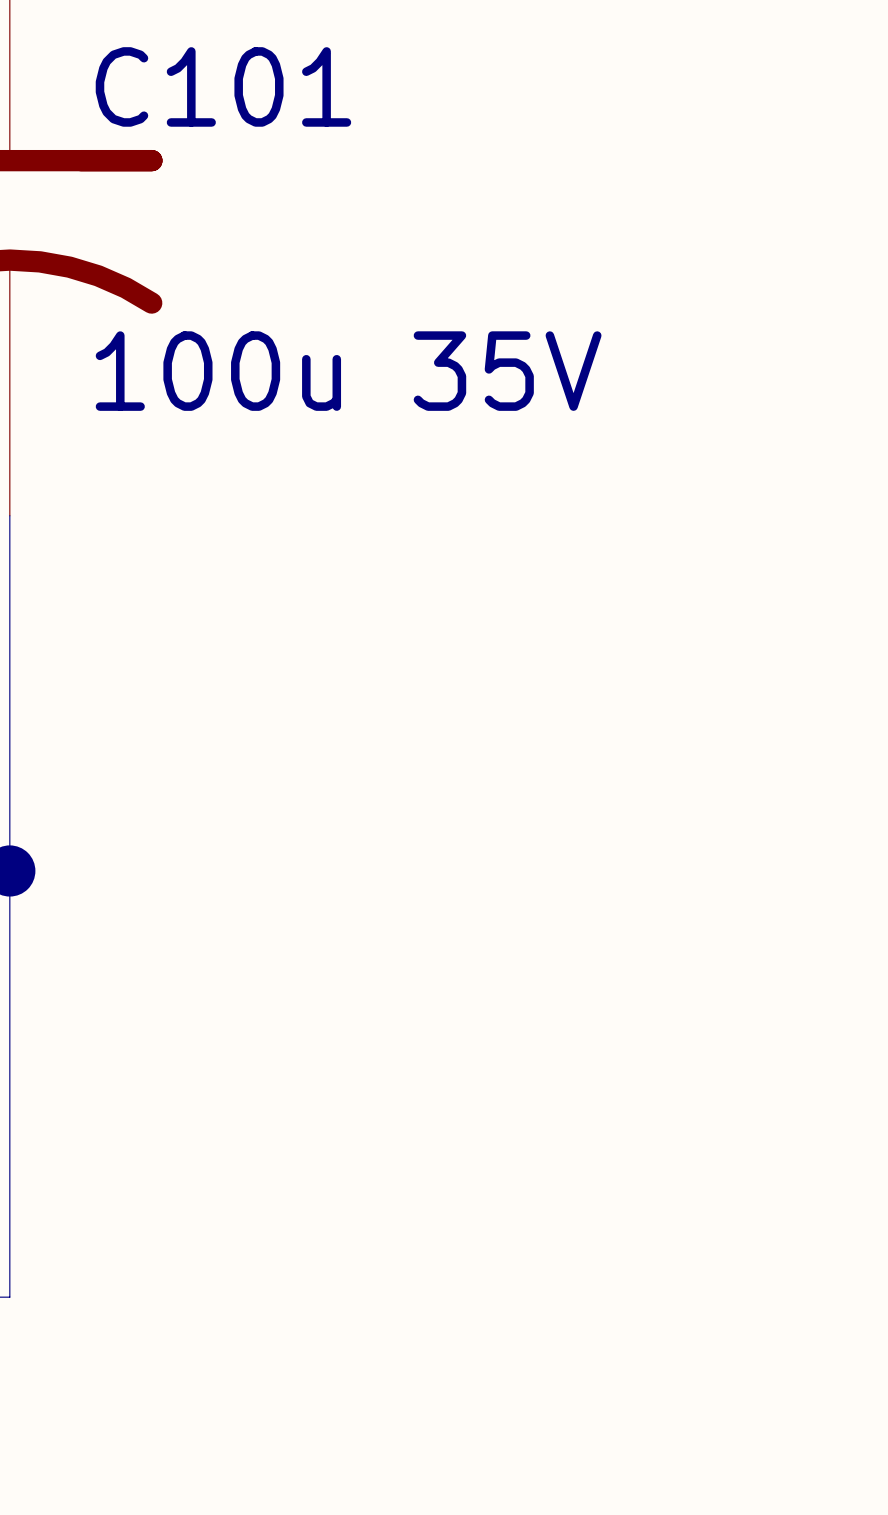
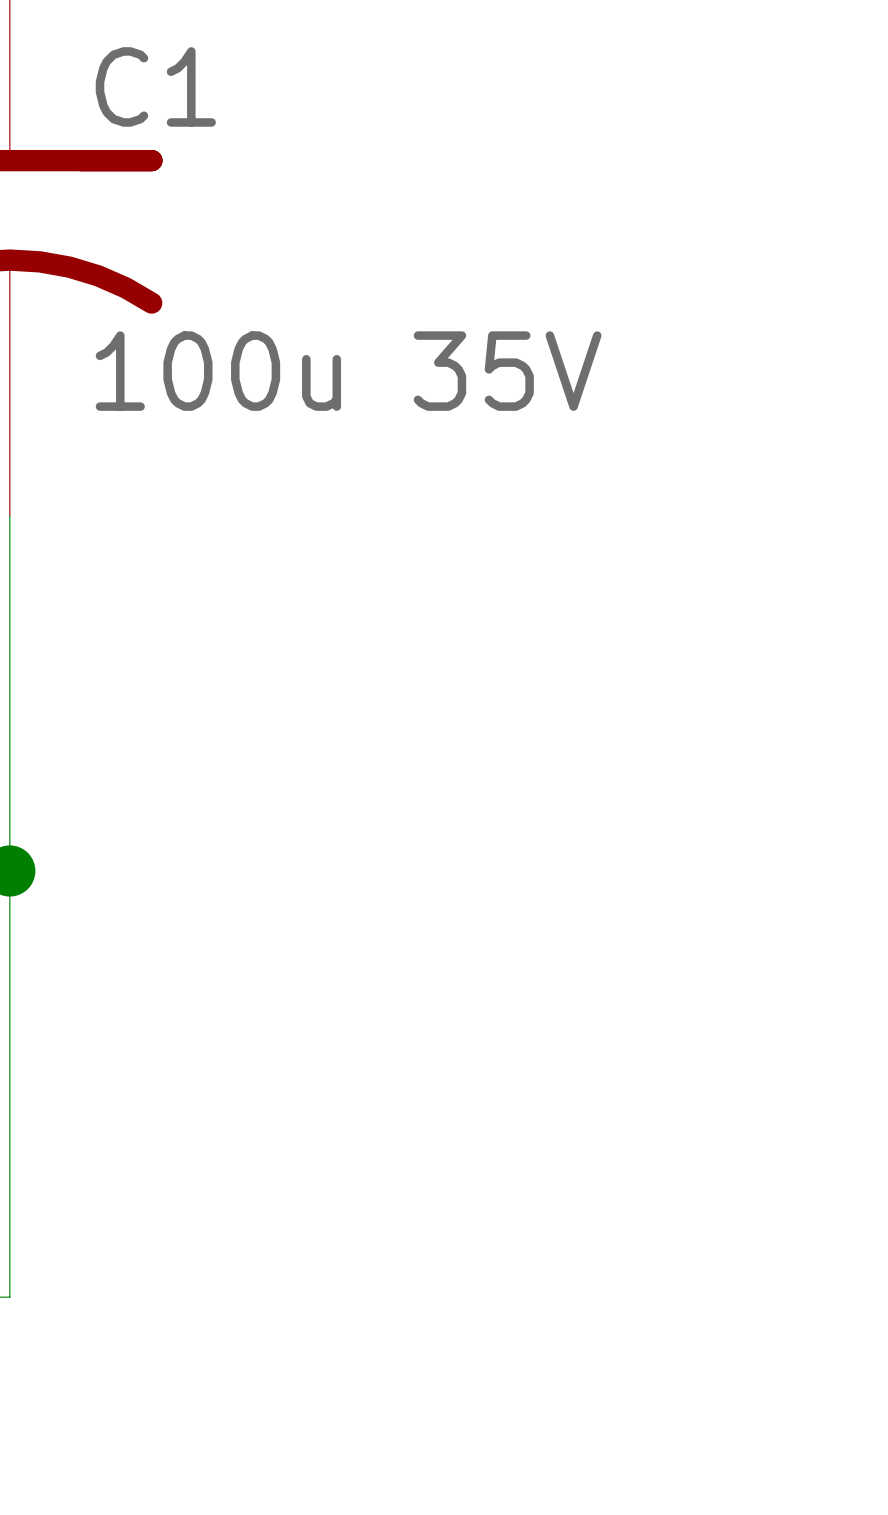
C101 name: C101 (223, 86) -> C1 (155, 86)

